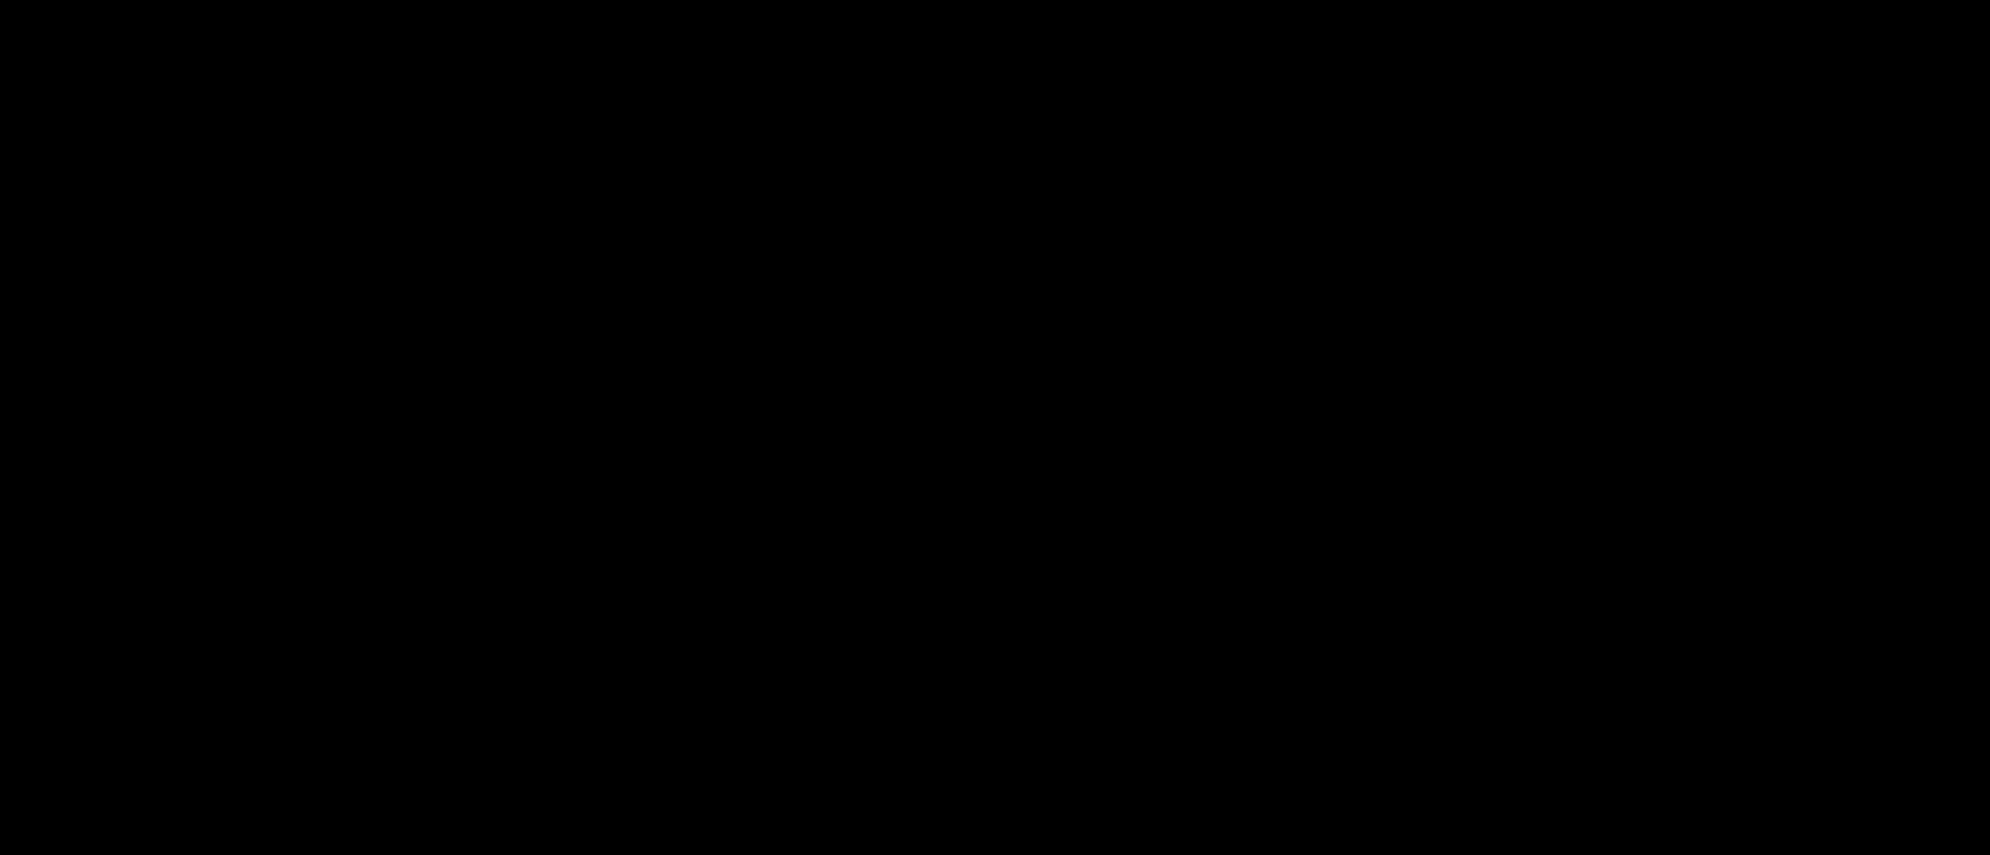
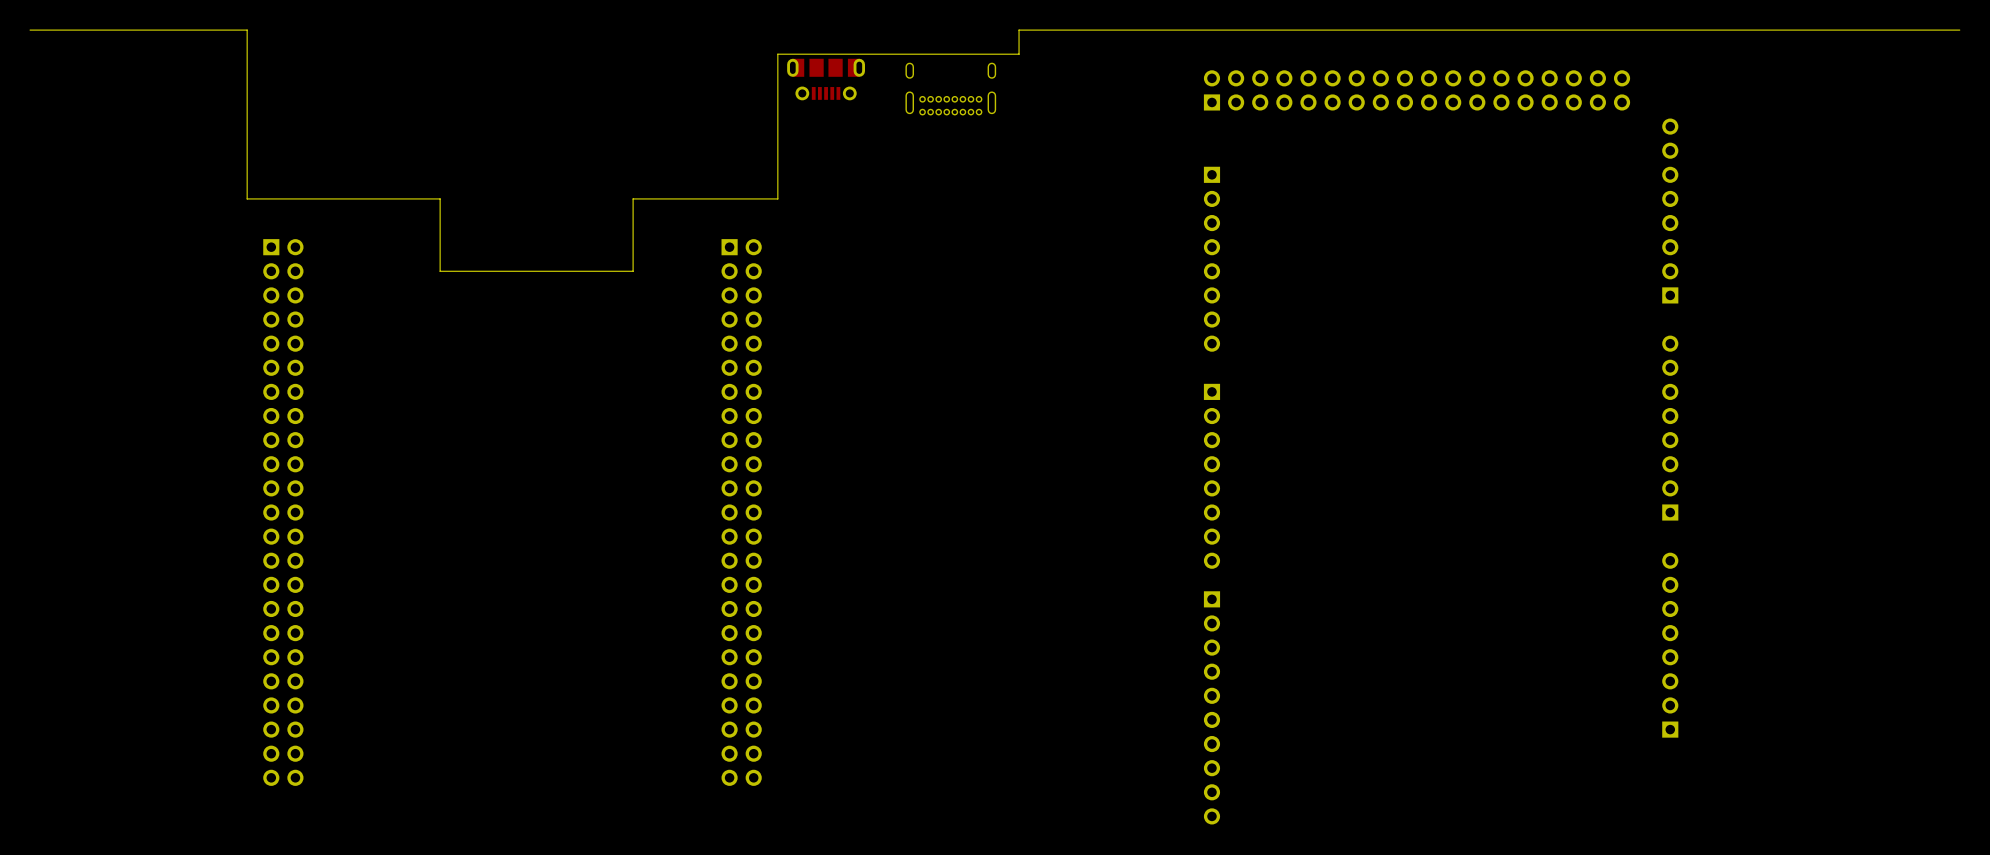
board edge: none -> (1959, 30) (1019, 30) (1019, 54) (777, 54) (777, 198) (633, 198) (633, 271) (440, 271) (440, 198) (247, 198) (247, 30) (30, 30)
part: none -> (826, 79)
part: none -> (950, 89)
part: none -> (1417, 90)
part: none -> (1670, 211)
part: none -> (1211, 259)
part: none -> (1670, 428)
part: none -> (1211, 476)
part: none -> (283, 512)
part: none -> (741, 512)
part: none -> (1670, 645)
part: none -> (1211, 707)

